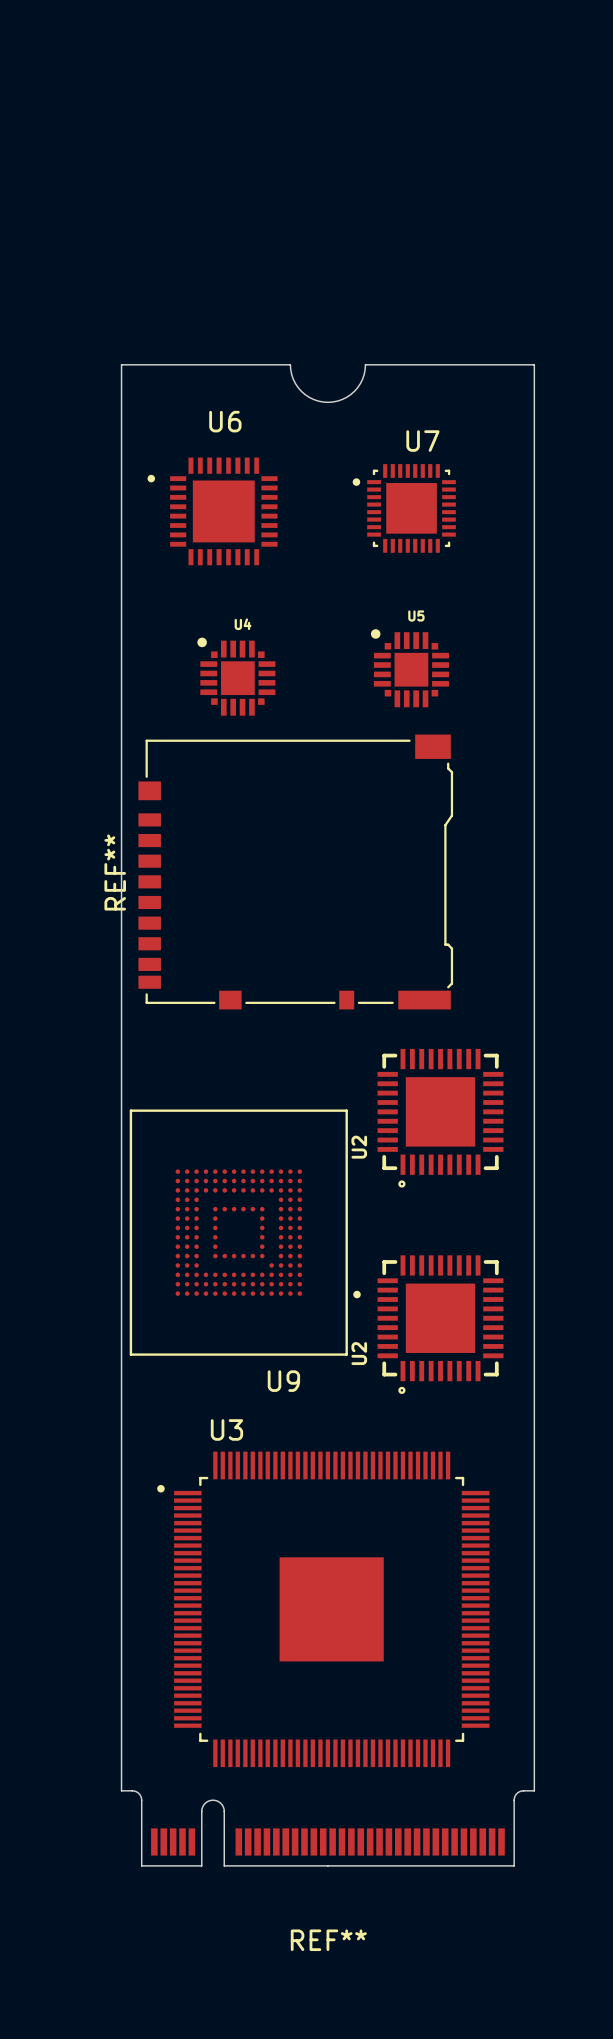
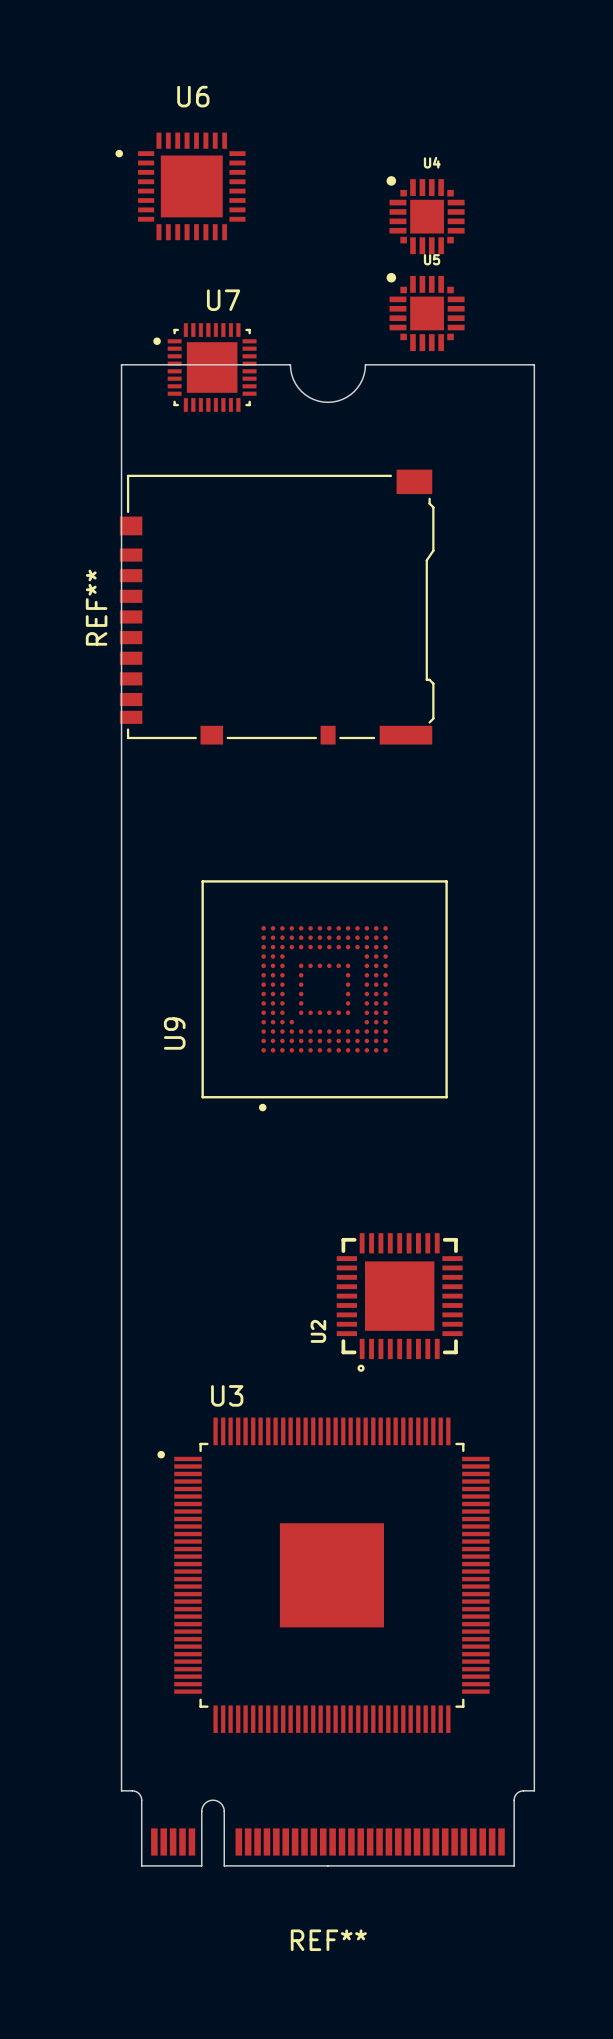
U7 position: (404, 508) -> (204, 367)
U6 position: (212, 511) -> (180, 186)
U5 position: (409, 668) -> (425, 311)
U4 position: (236, 676) -> (425, 215)
REF** position: (295, 871) -> (277, 607)
U2: (440, 1118) -> none
U9 rotation: 0° (245, 1232) -> 90° clockwise (324, 995)
U9 position: (245, 1232) -> (324, 995)
U2 position: (440, 1324) -> (399, 1302)
U3 position: (323, 1609) -> (323, 1575)

